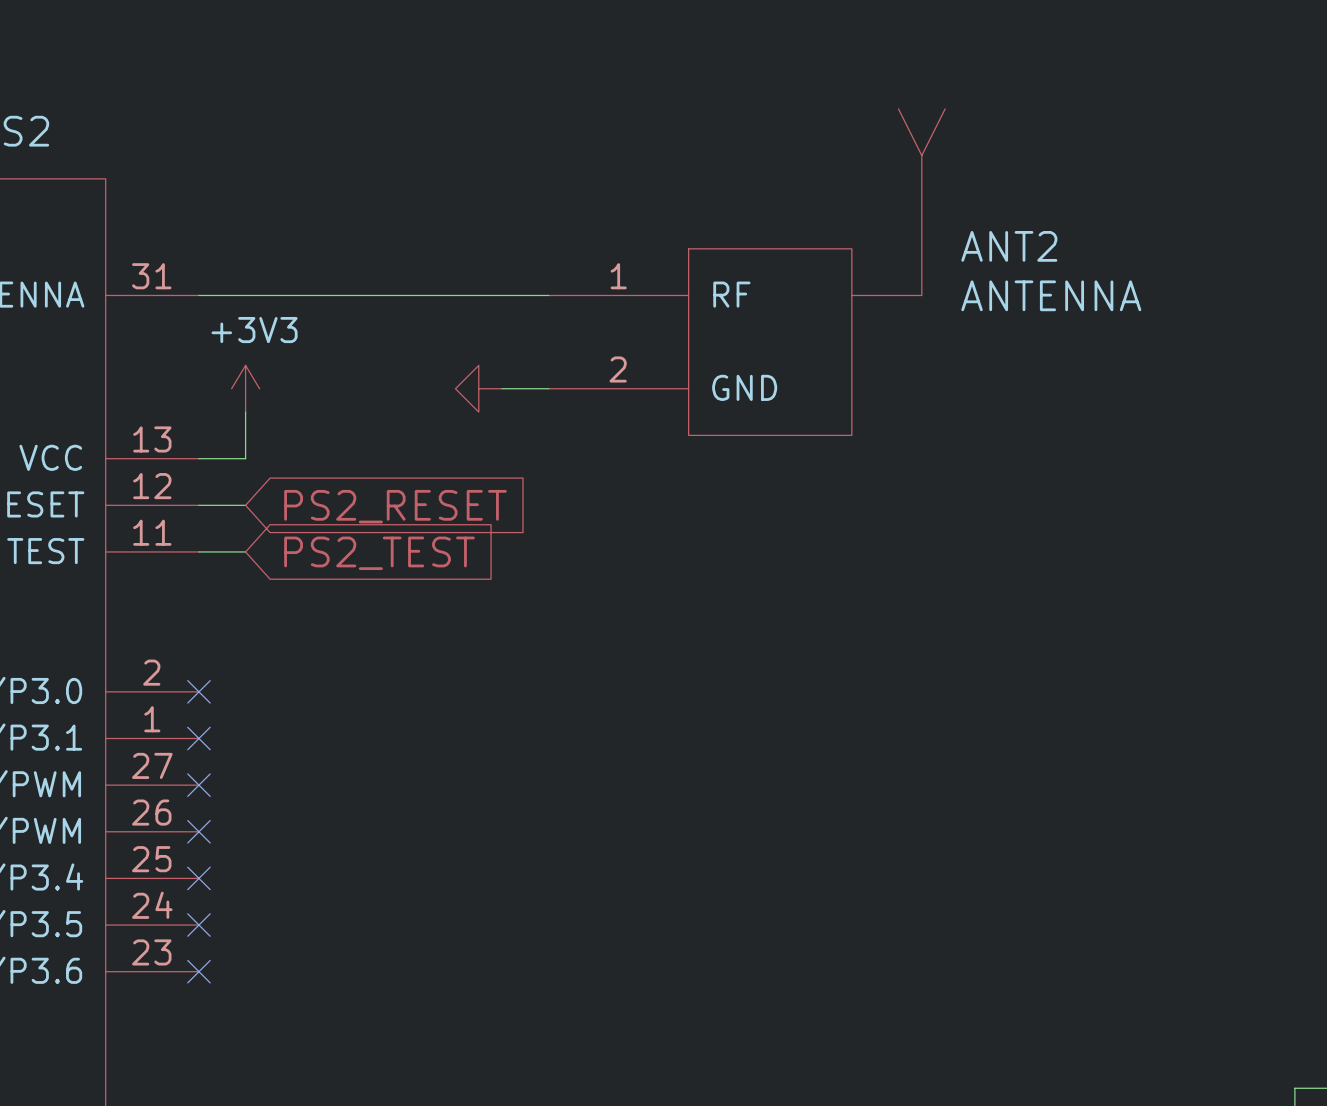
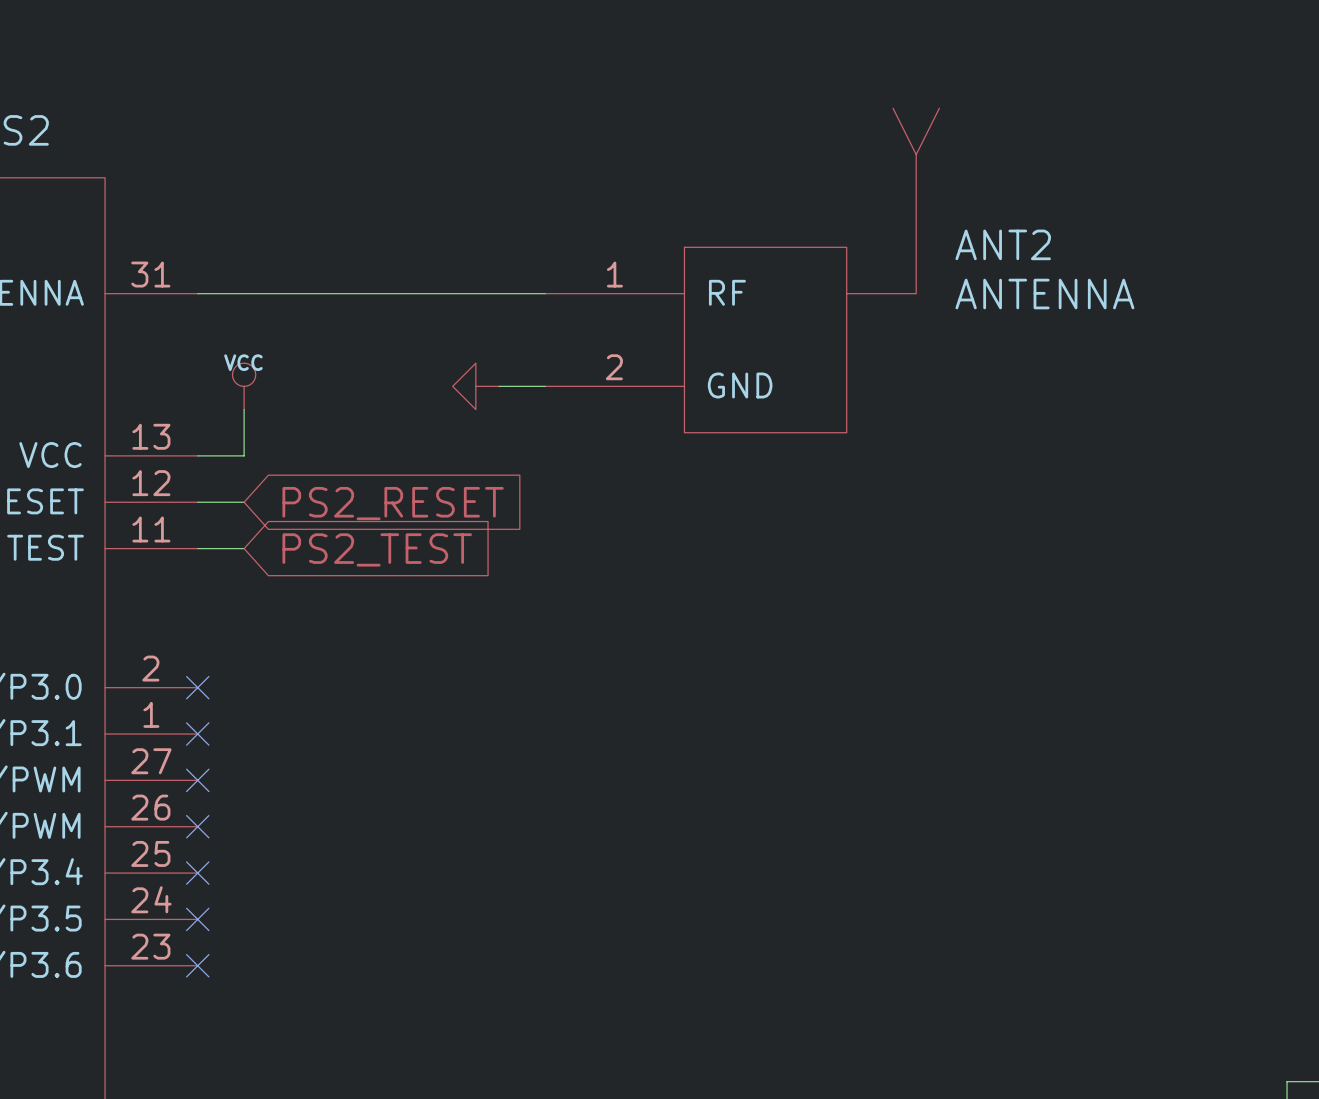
power symbol: +3V3 (245, 388) -> VCC (244, 386)

